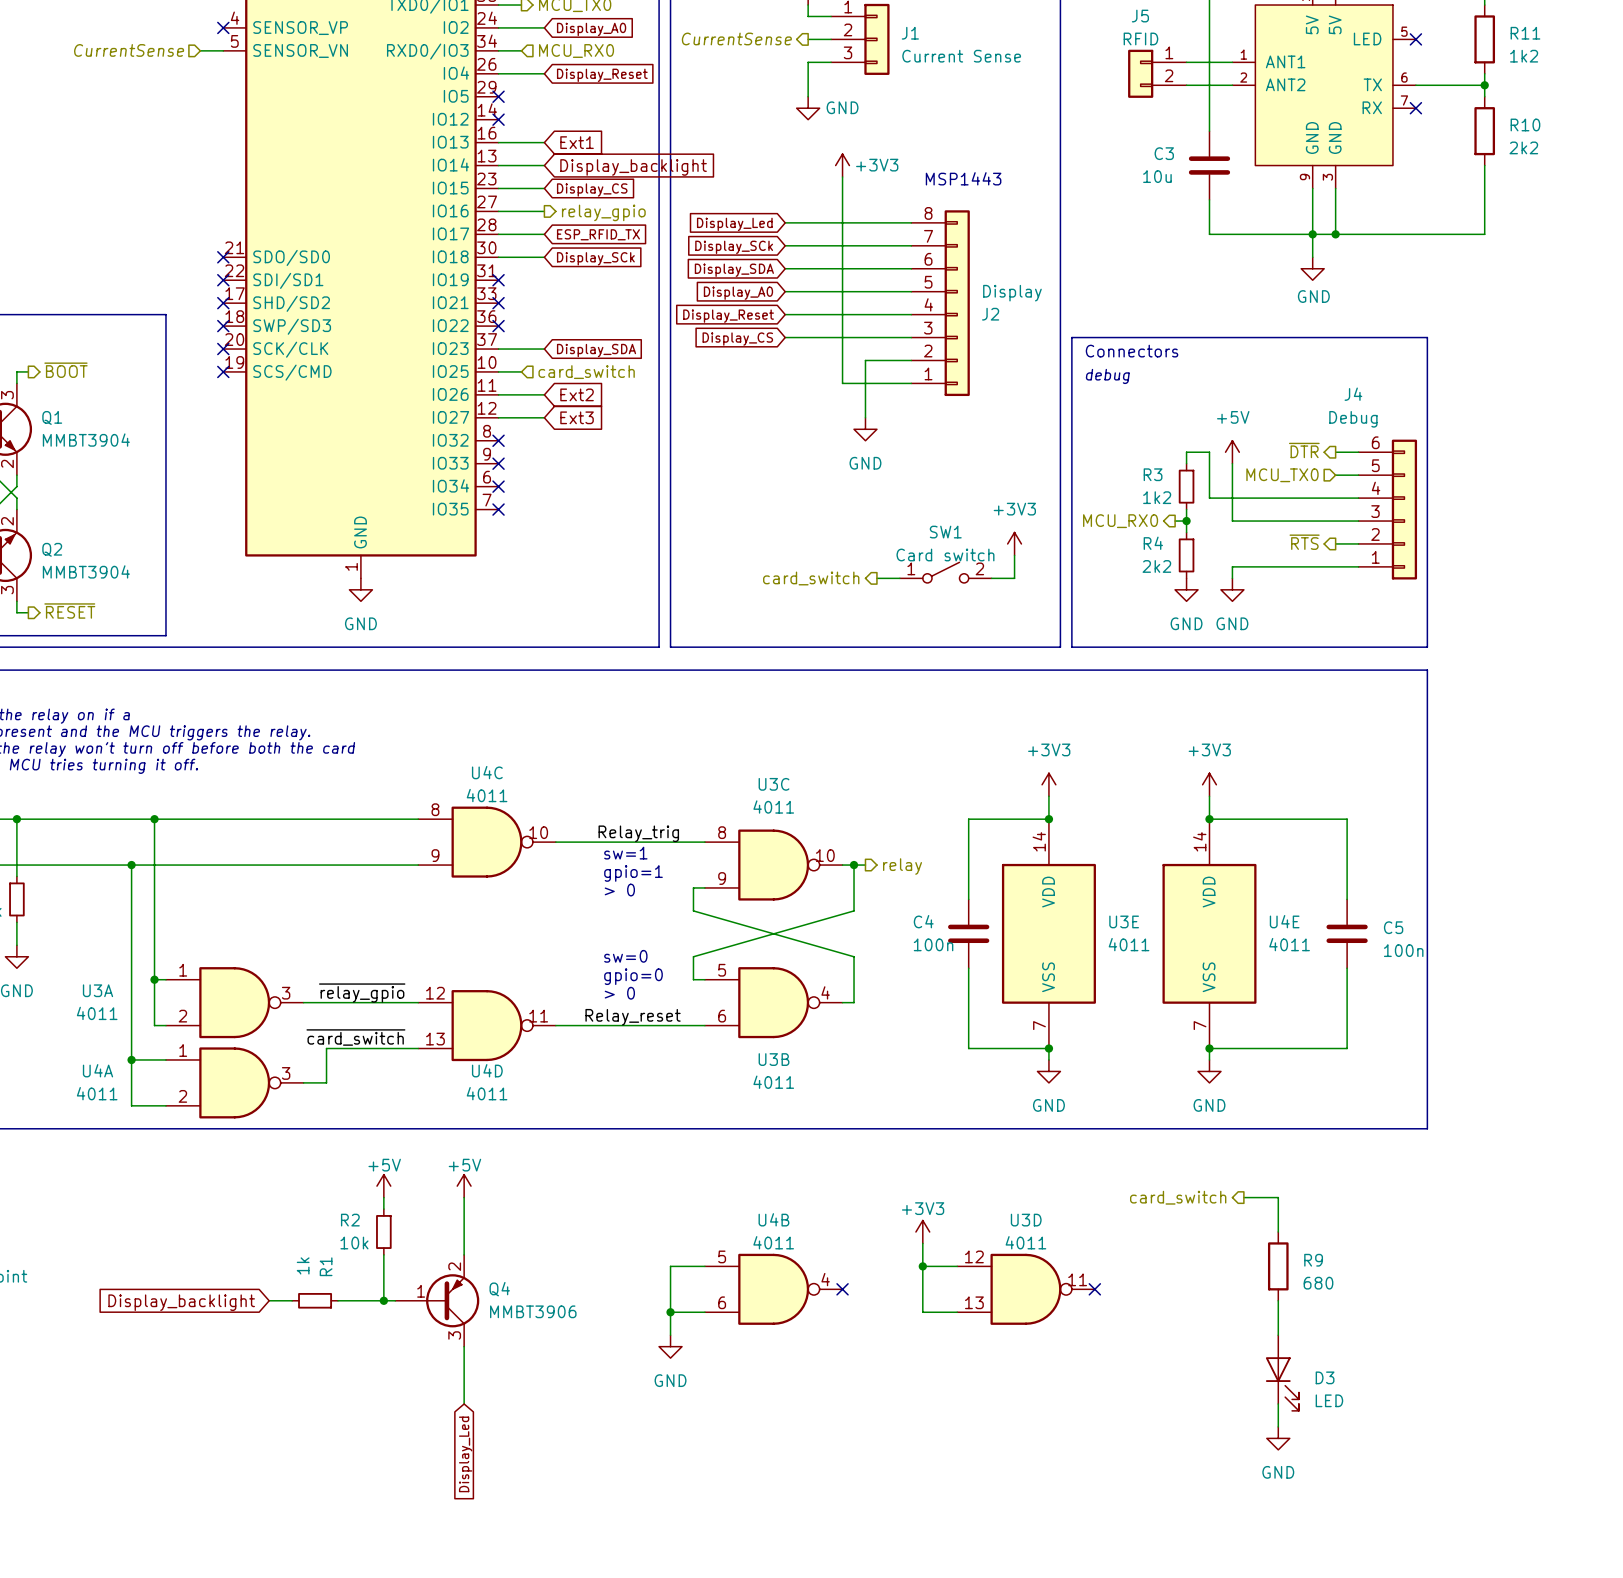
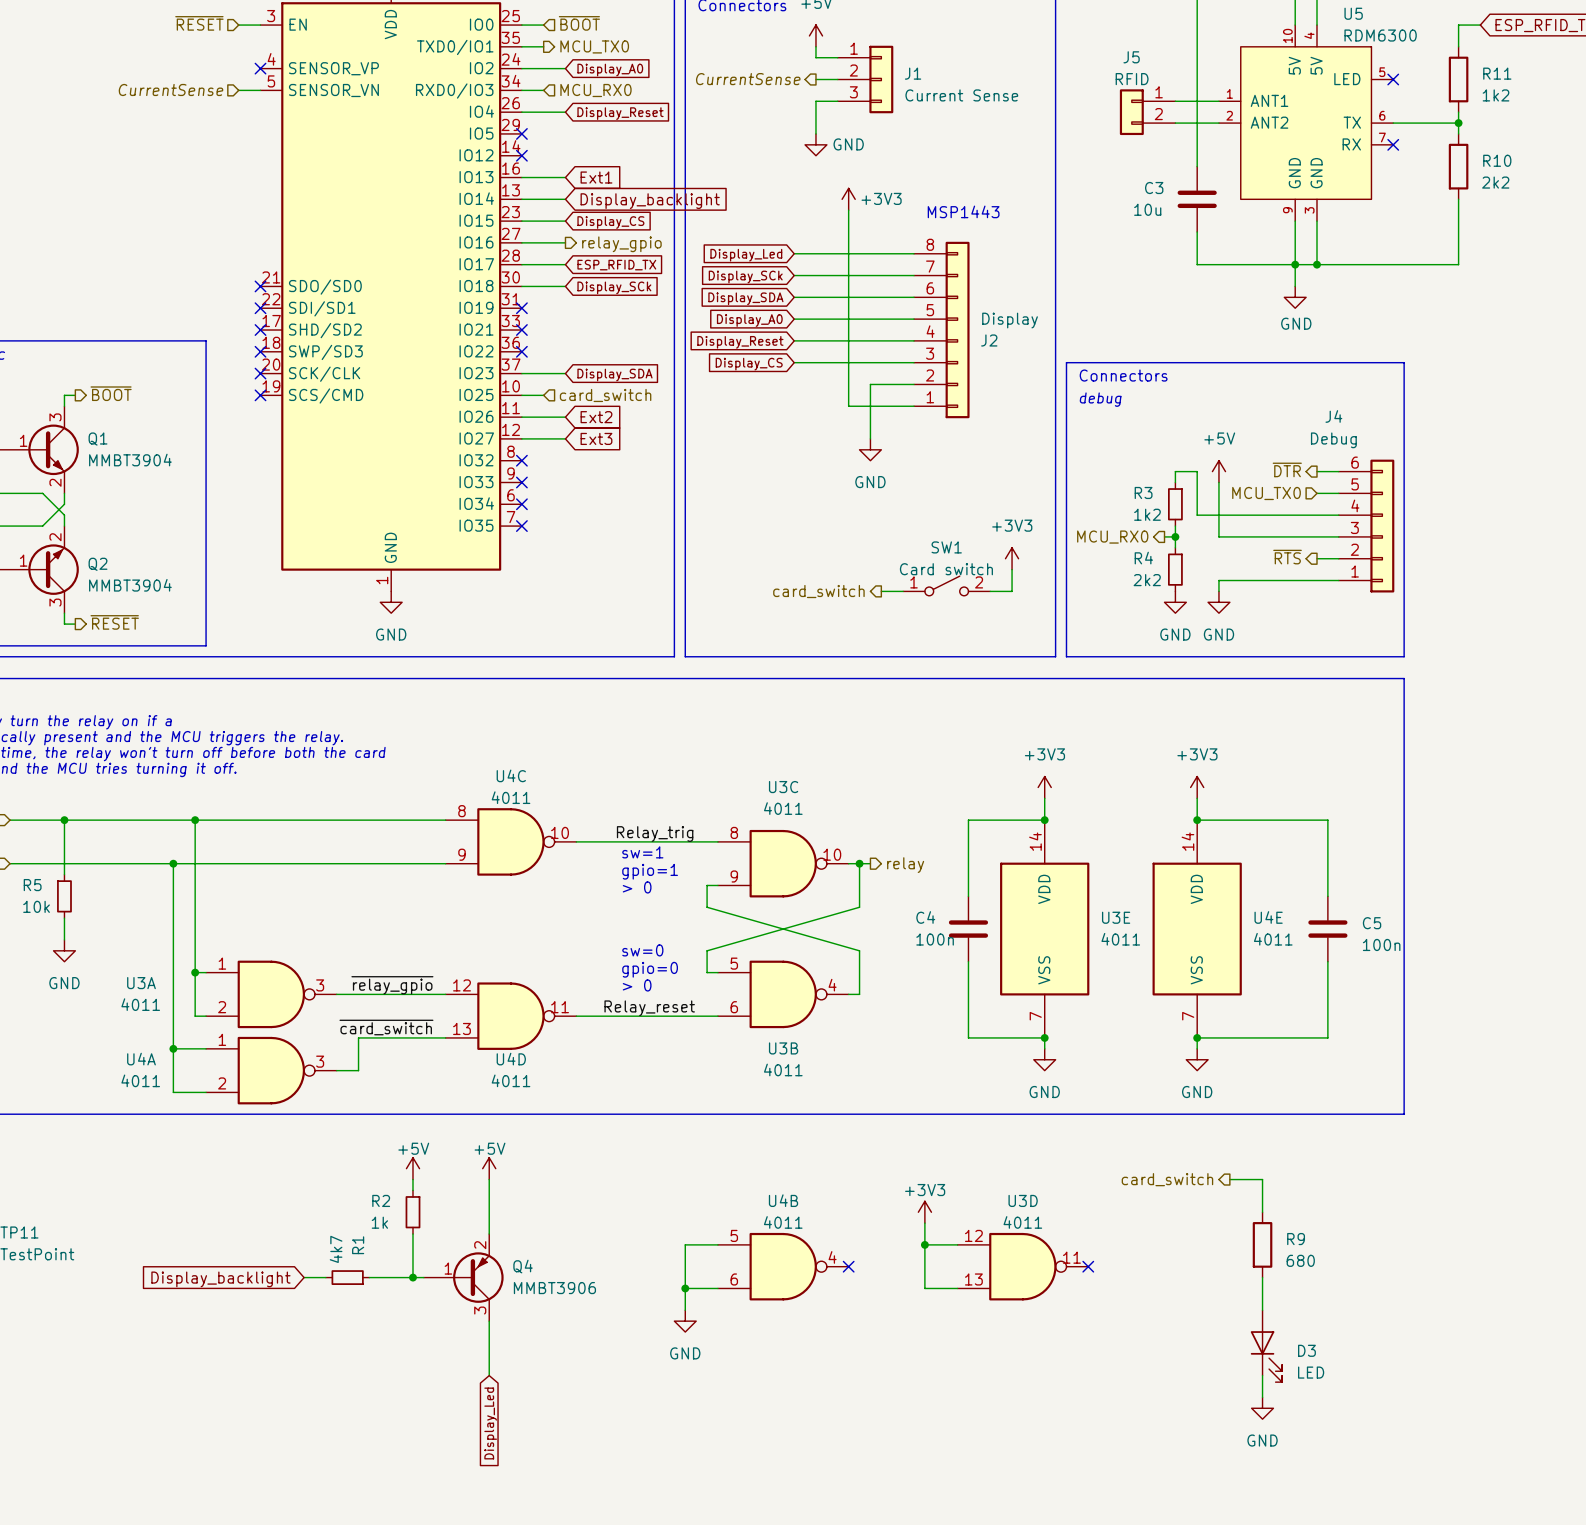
R2 value: 10k (354, 1243) -> 1k (379, 1222)
R1 value: 1k (303, 1265) -> 4k7 (336, 1249)

